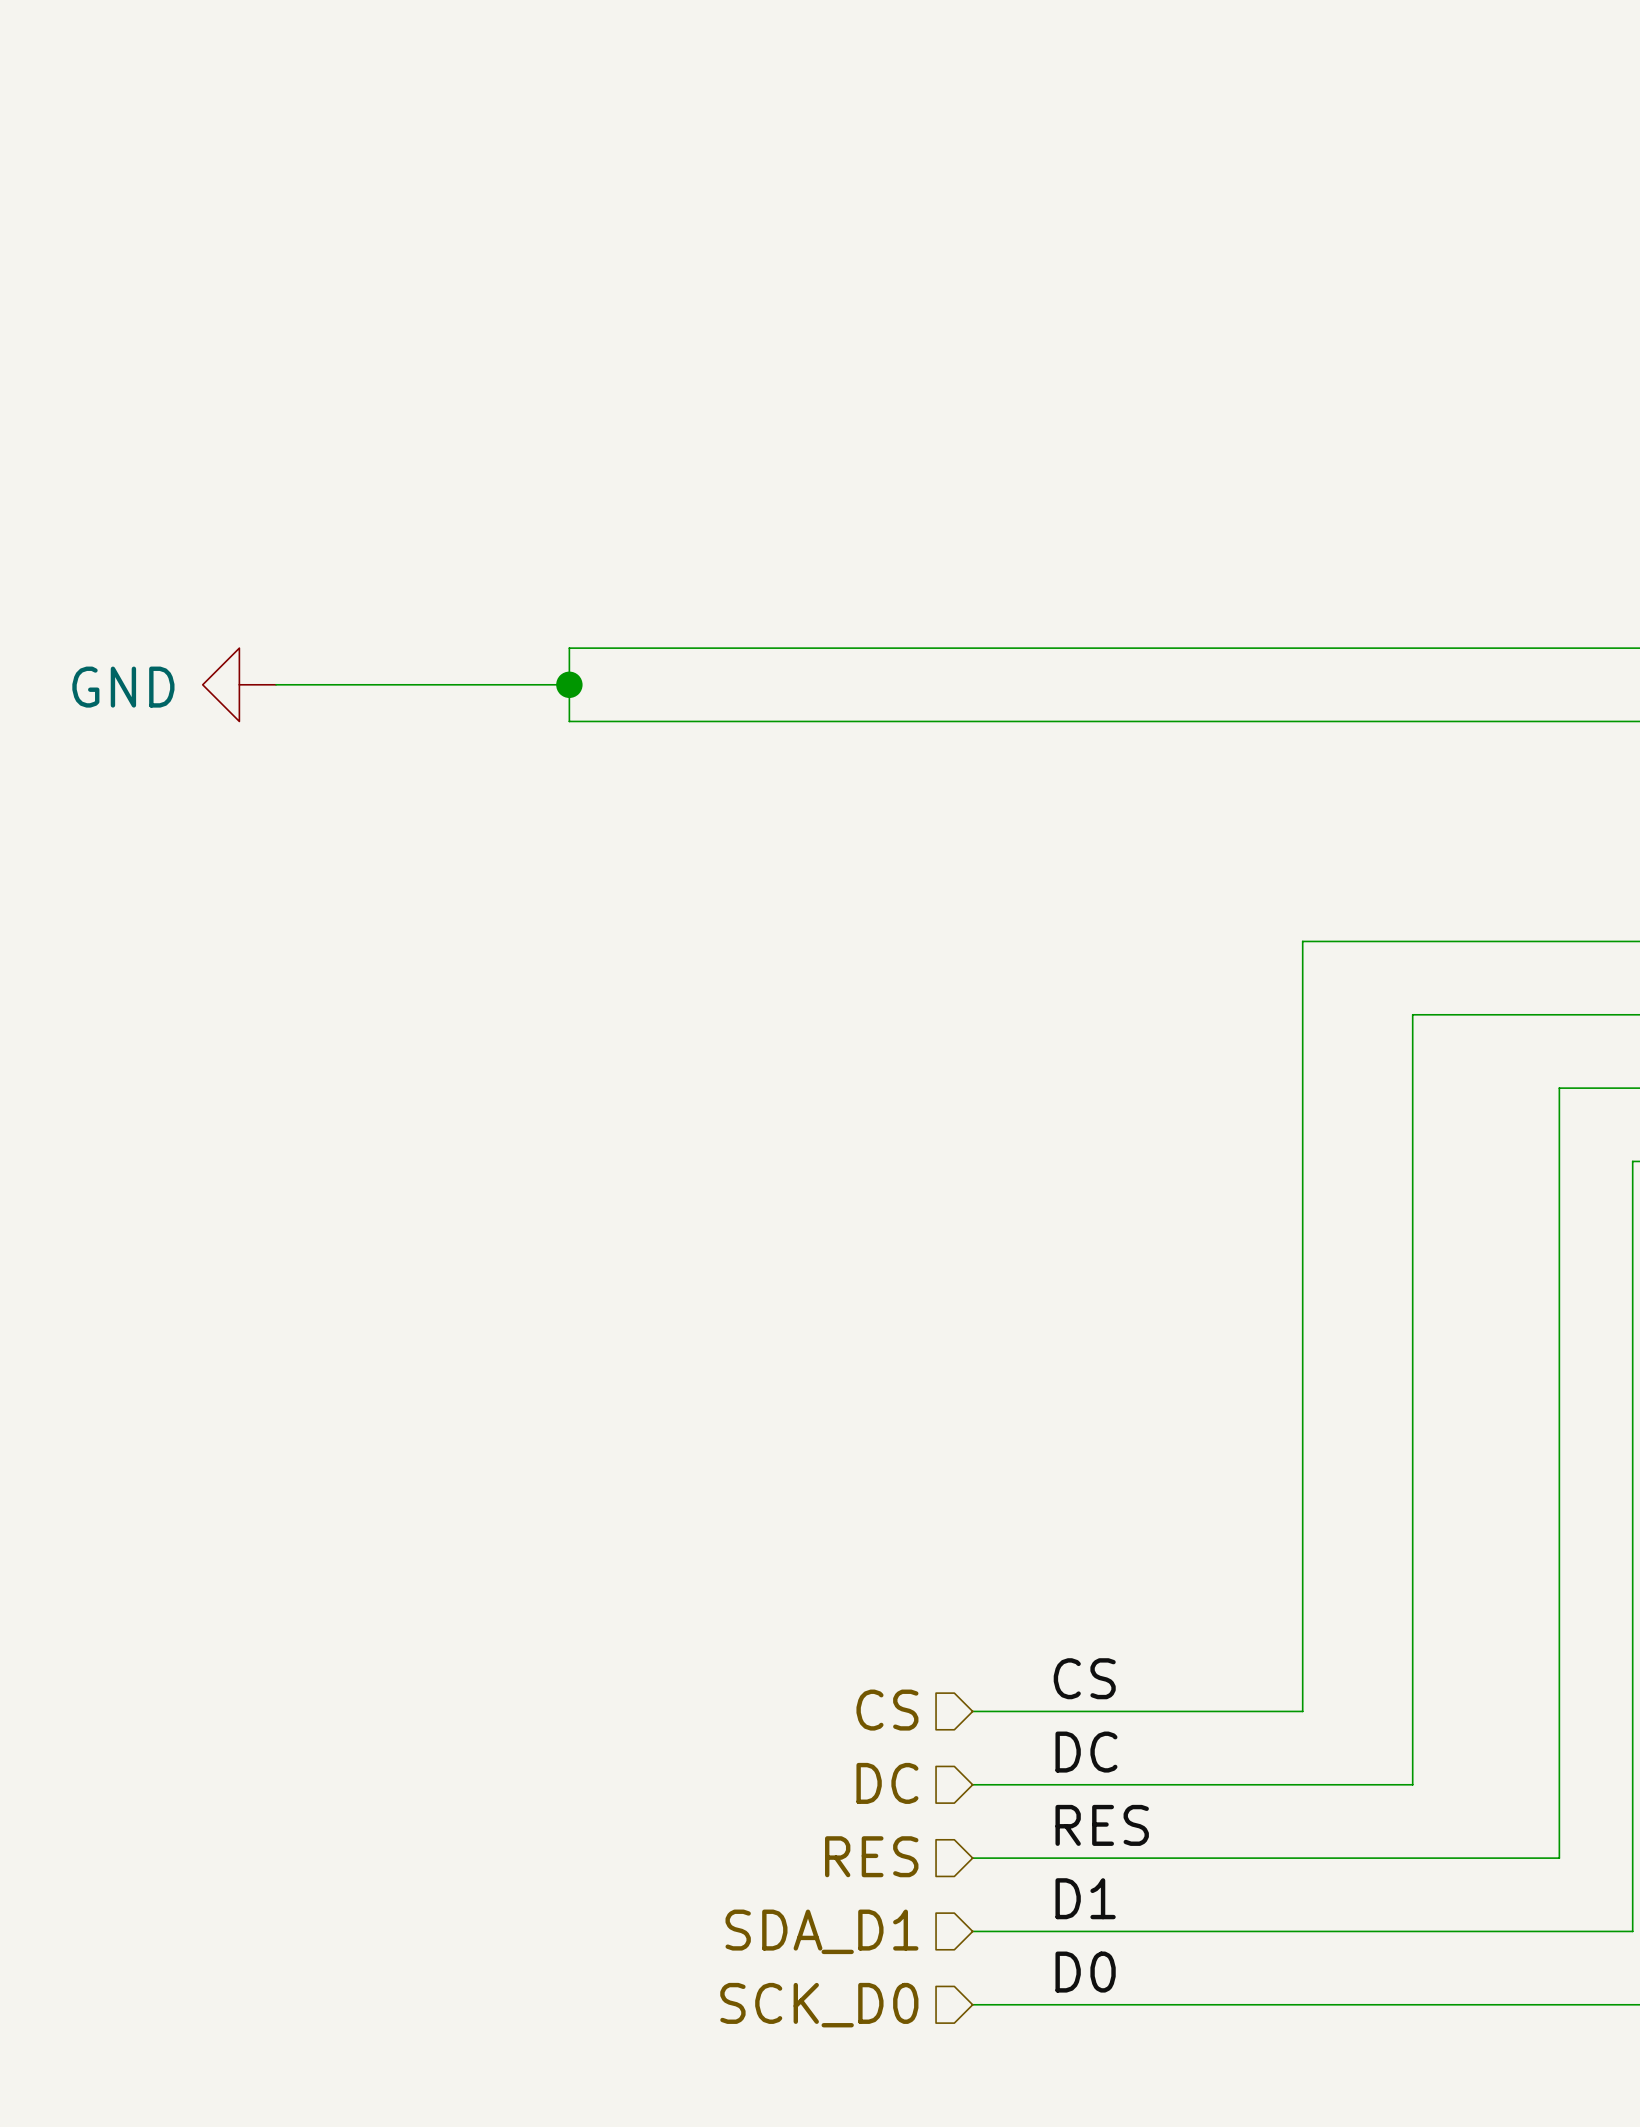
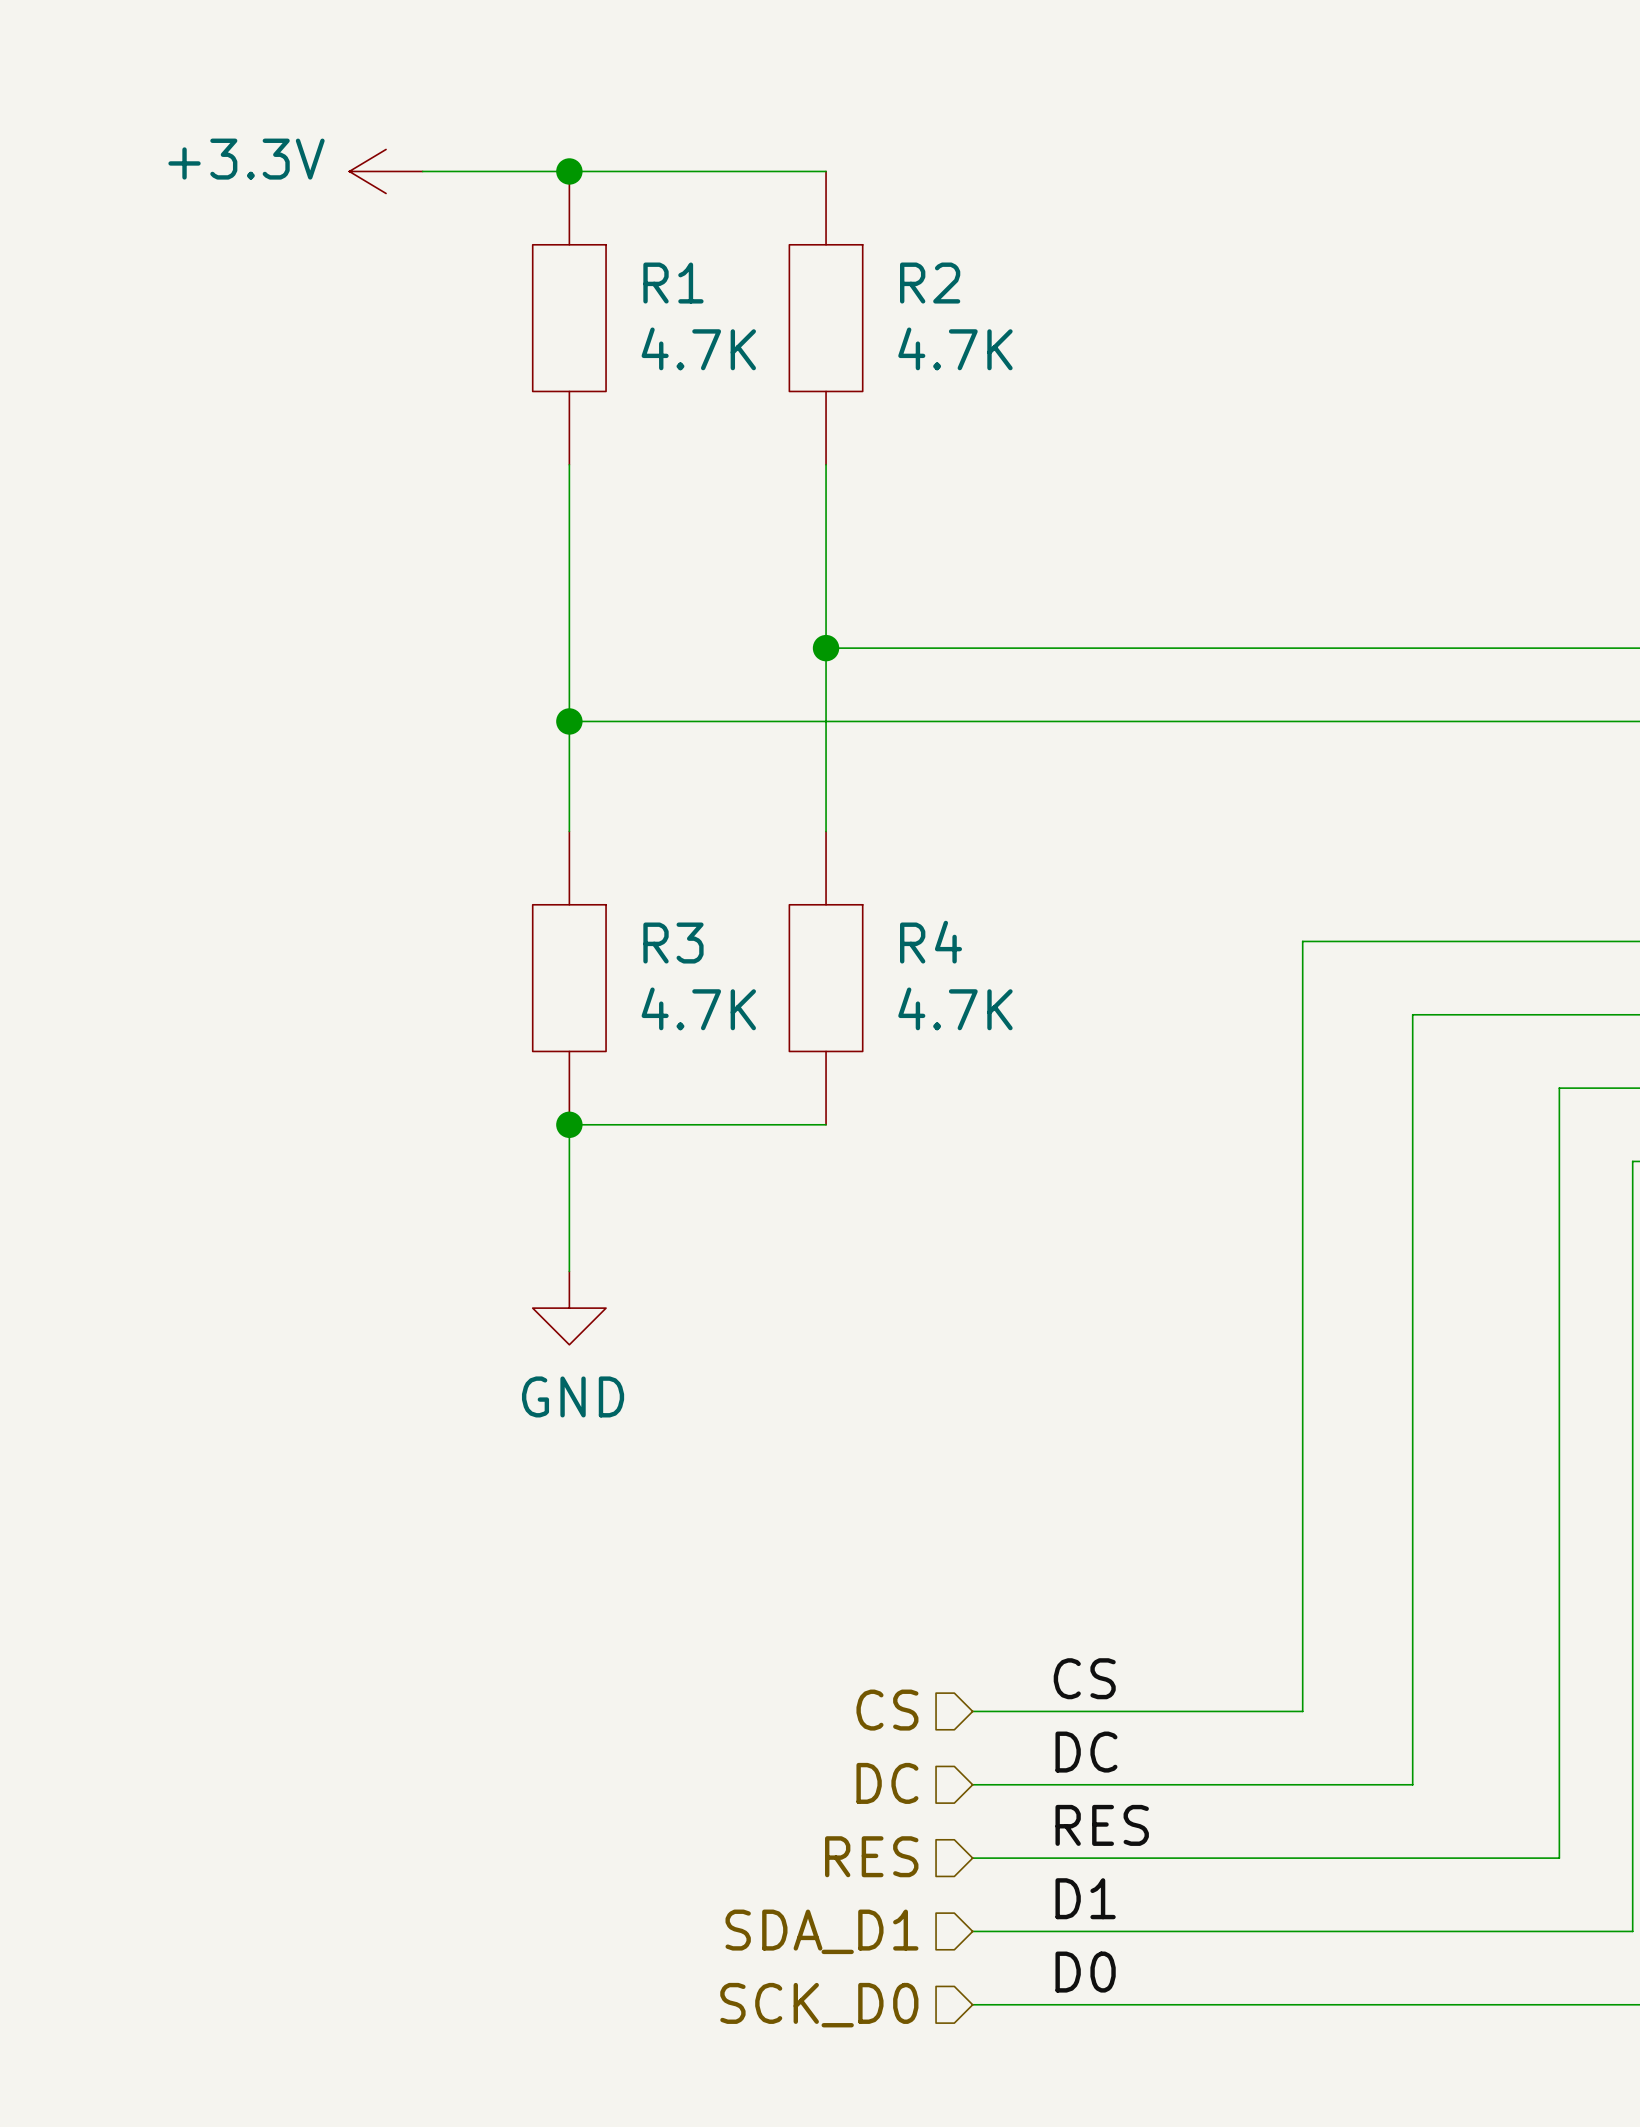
power symbol: none -> +3.3V (386, 171)
wire: none -> (422, 171) (826, 171)
junction: none -> (569, 171)
R1: none -> 4.7K (569, 318)
R2: none -> 4.7K (826, 318)
wire: none -> (826, 464) (826, 831)
wire: (569, 648) (826, 648) -> (569, 648) (569, 464)
junction: none -> (826, 648)
power symbol rotation: 0° (239, 684) -> 90° counterclockwise (569, 1308)
power symbol position: GND (239, 684) -> GND (569, 1308)
wire: (276, 684) (569, 684) -> none
junction position: (569, 684) -> (569, 721)
wire: none -> (569, 721) (569, 831)
R3: none -> 4.7K (569, 978)
R4: none -> 4.7K (826, 978)
junction: none -> (569, 1124)
wire: none -> (826, 1124) (569, 1124) (569, 1271)

